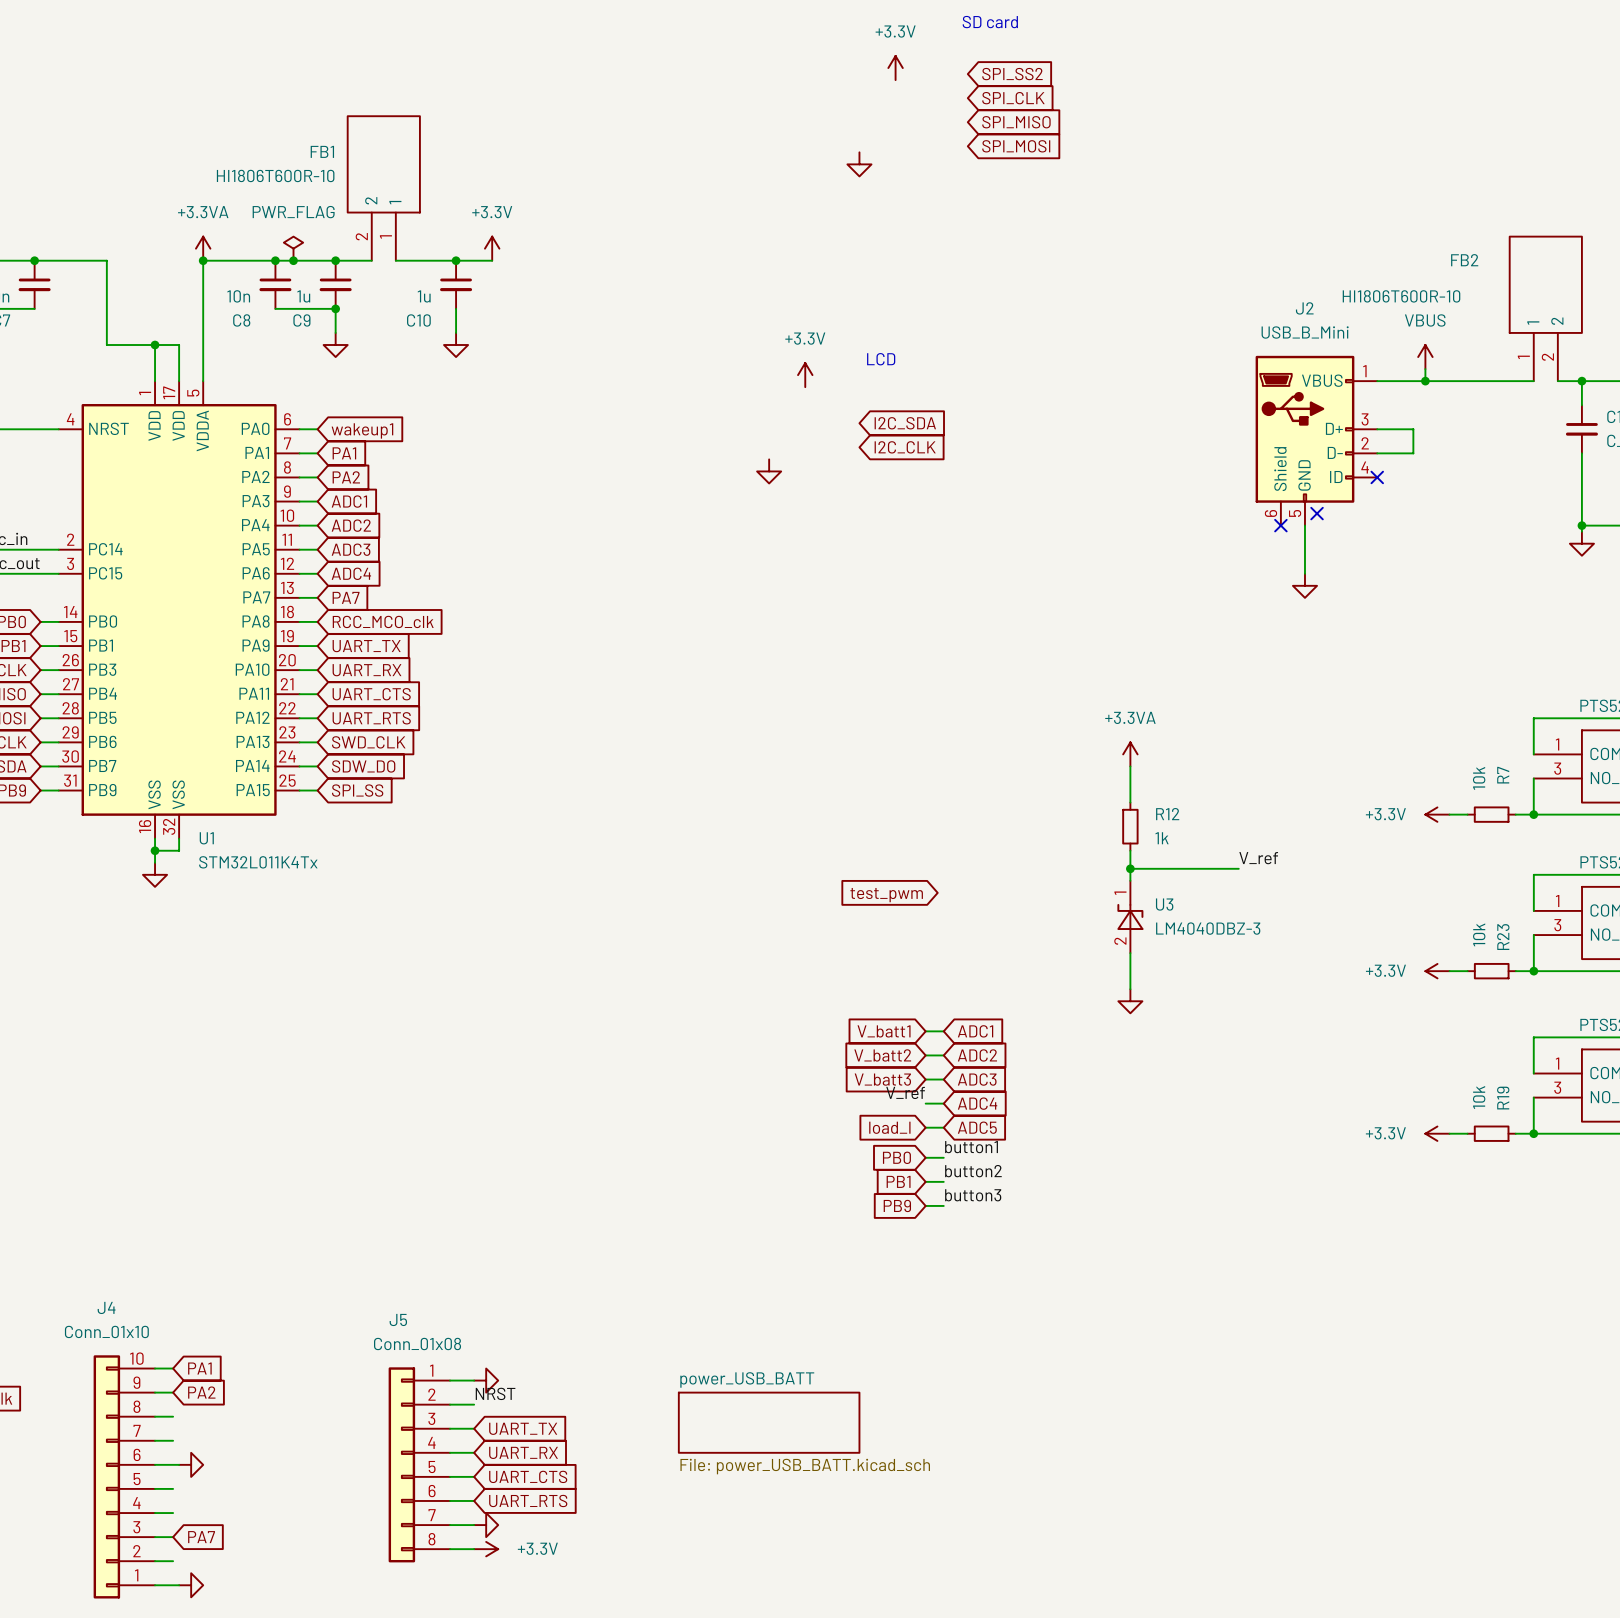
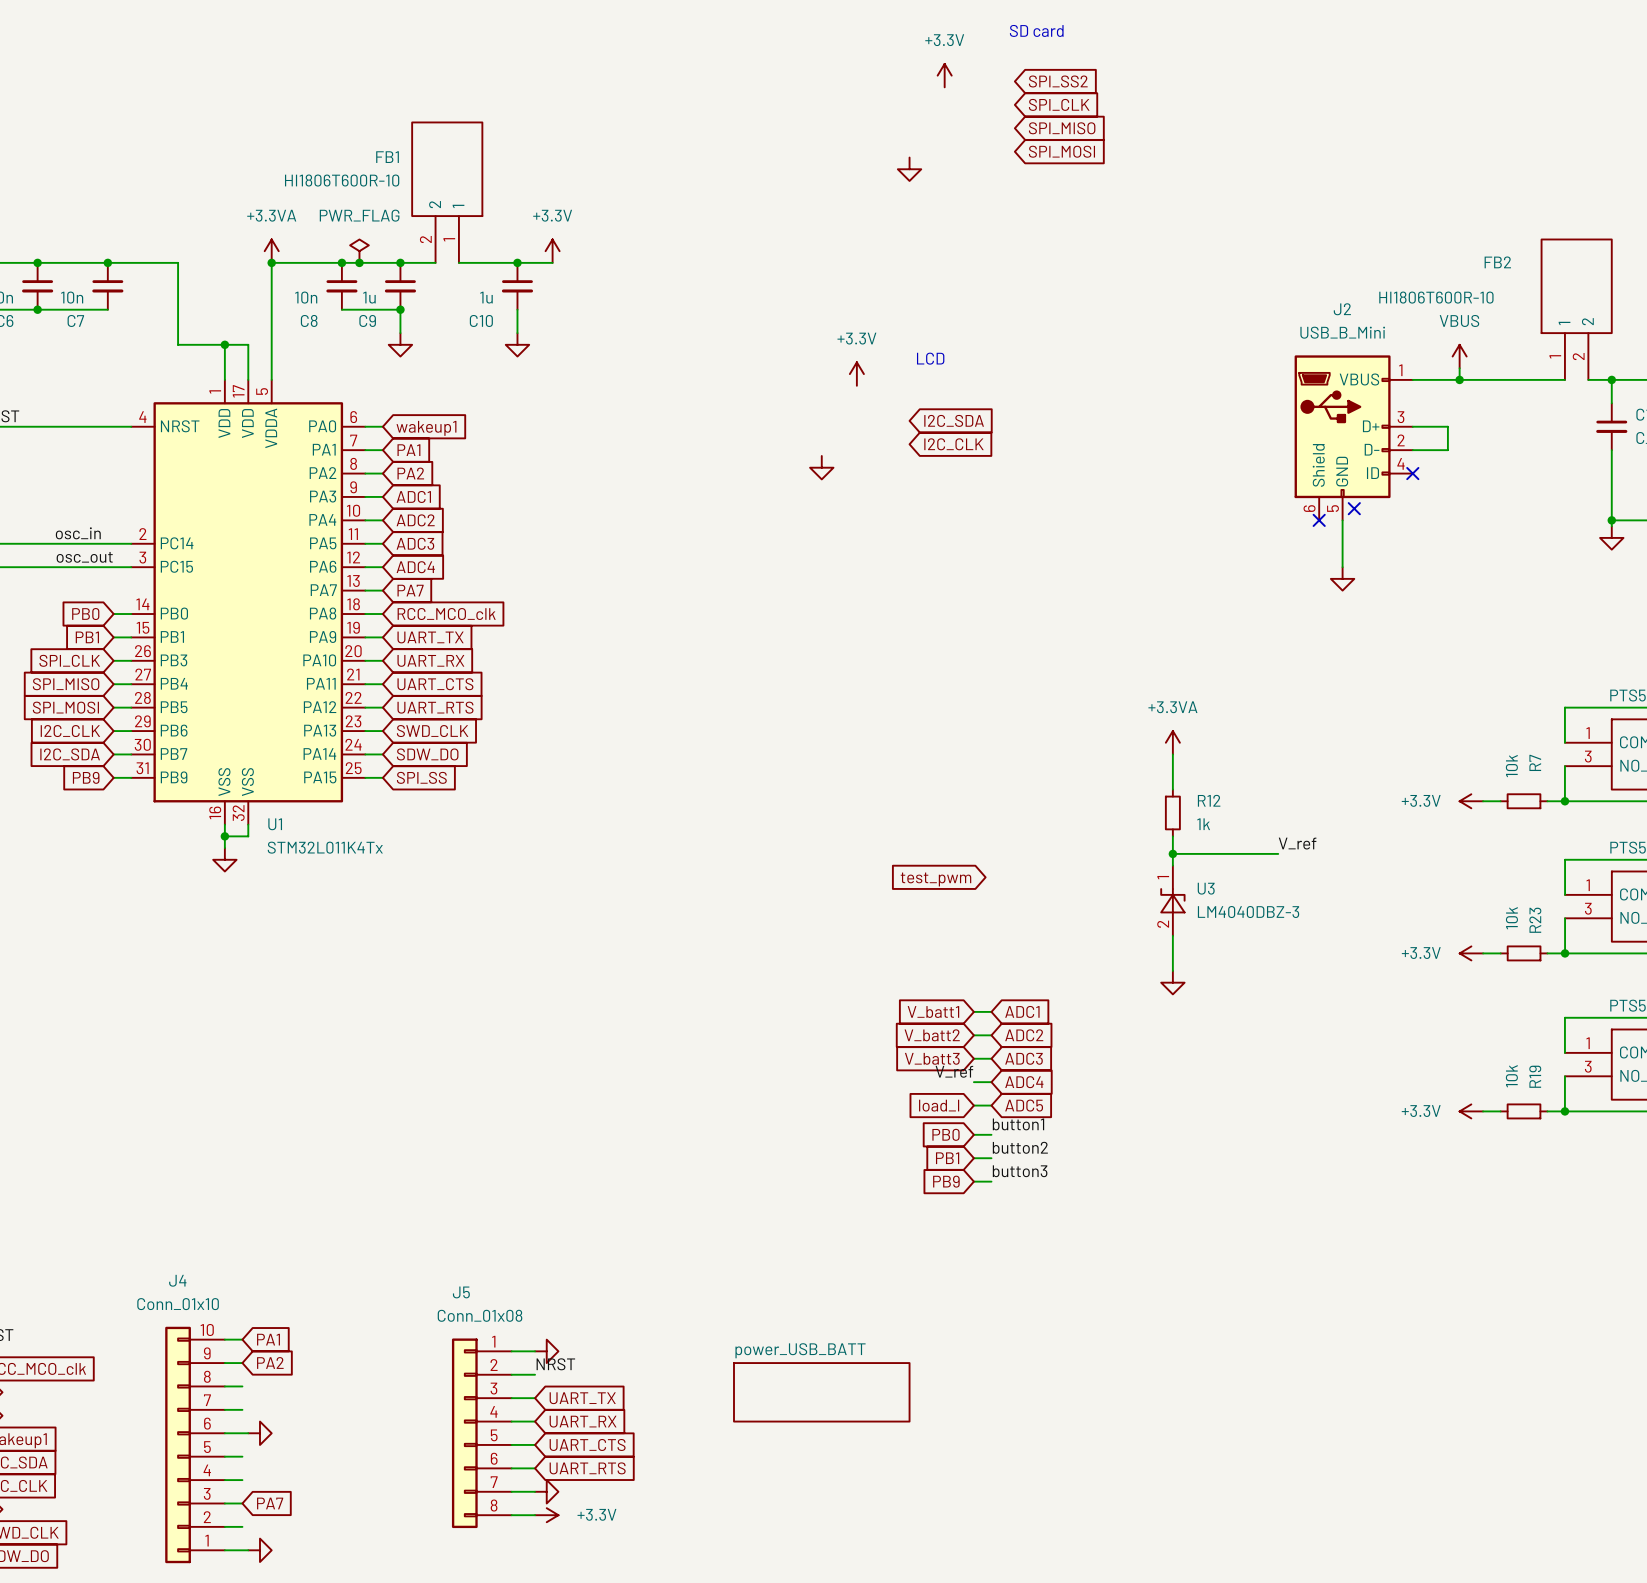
sheet power_USB_BATT value: File: power_USB_BATT.kicad_sch (805, 1466) -> none

